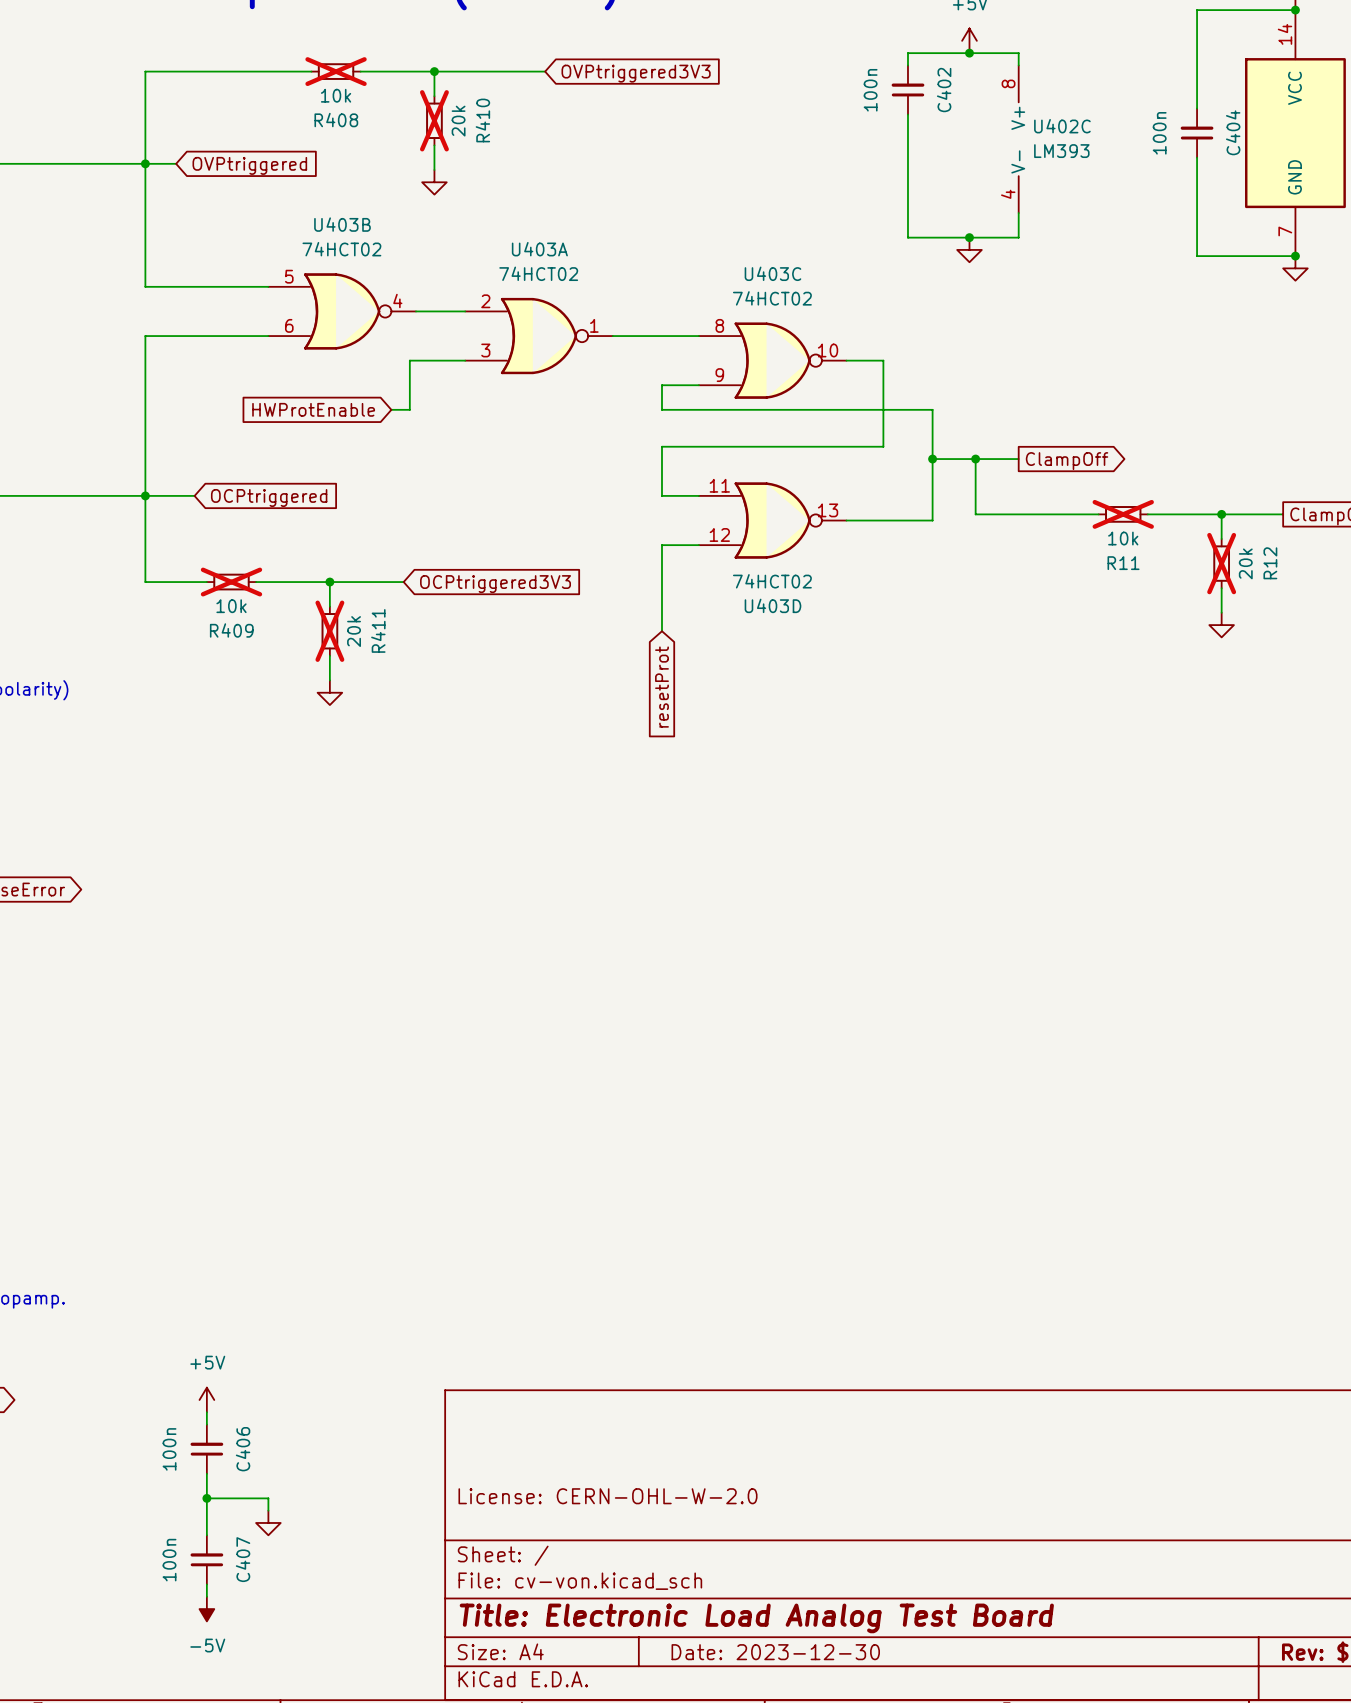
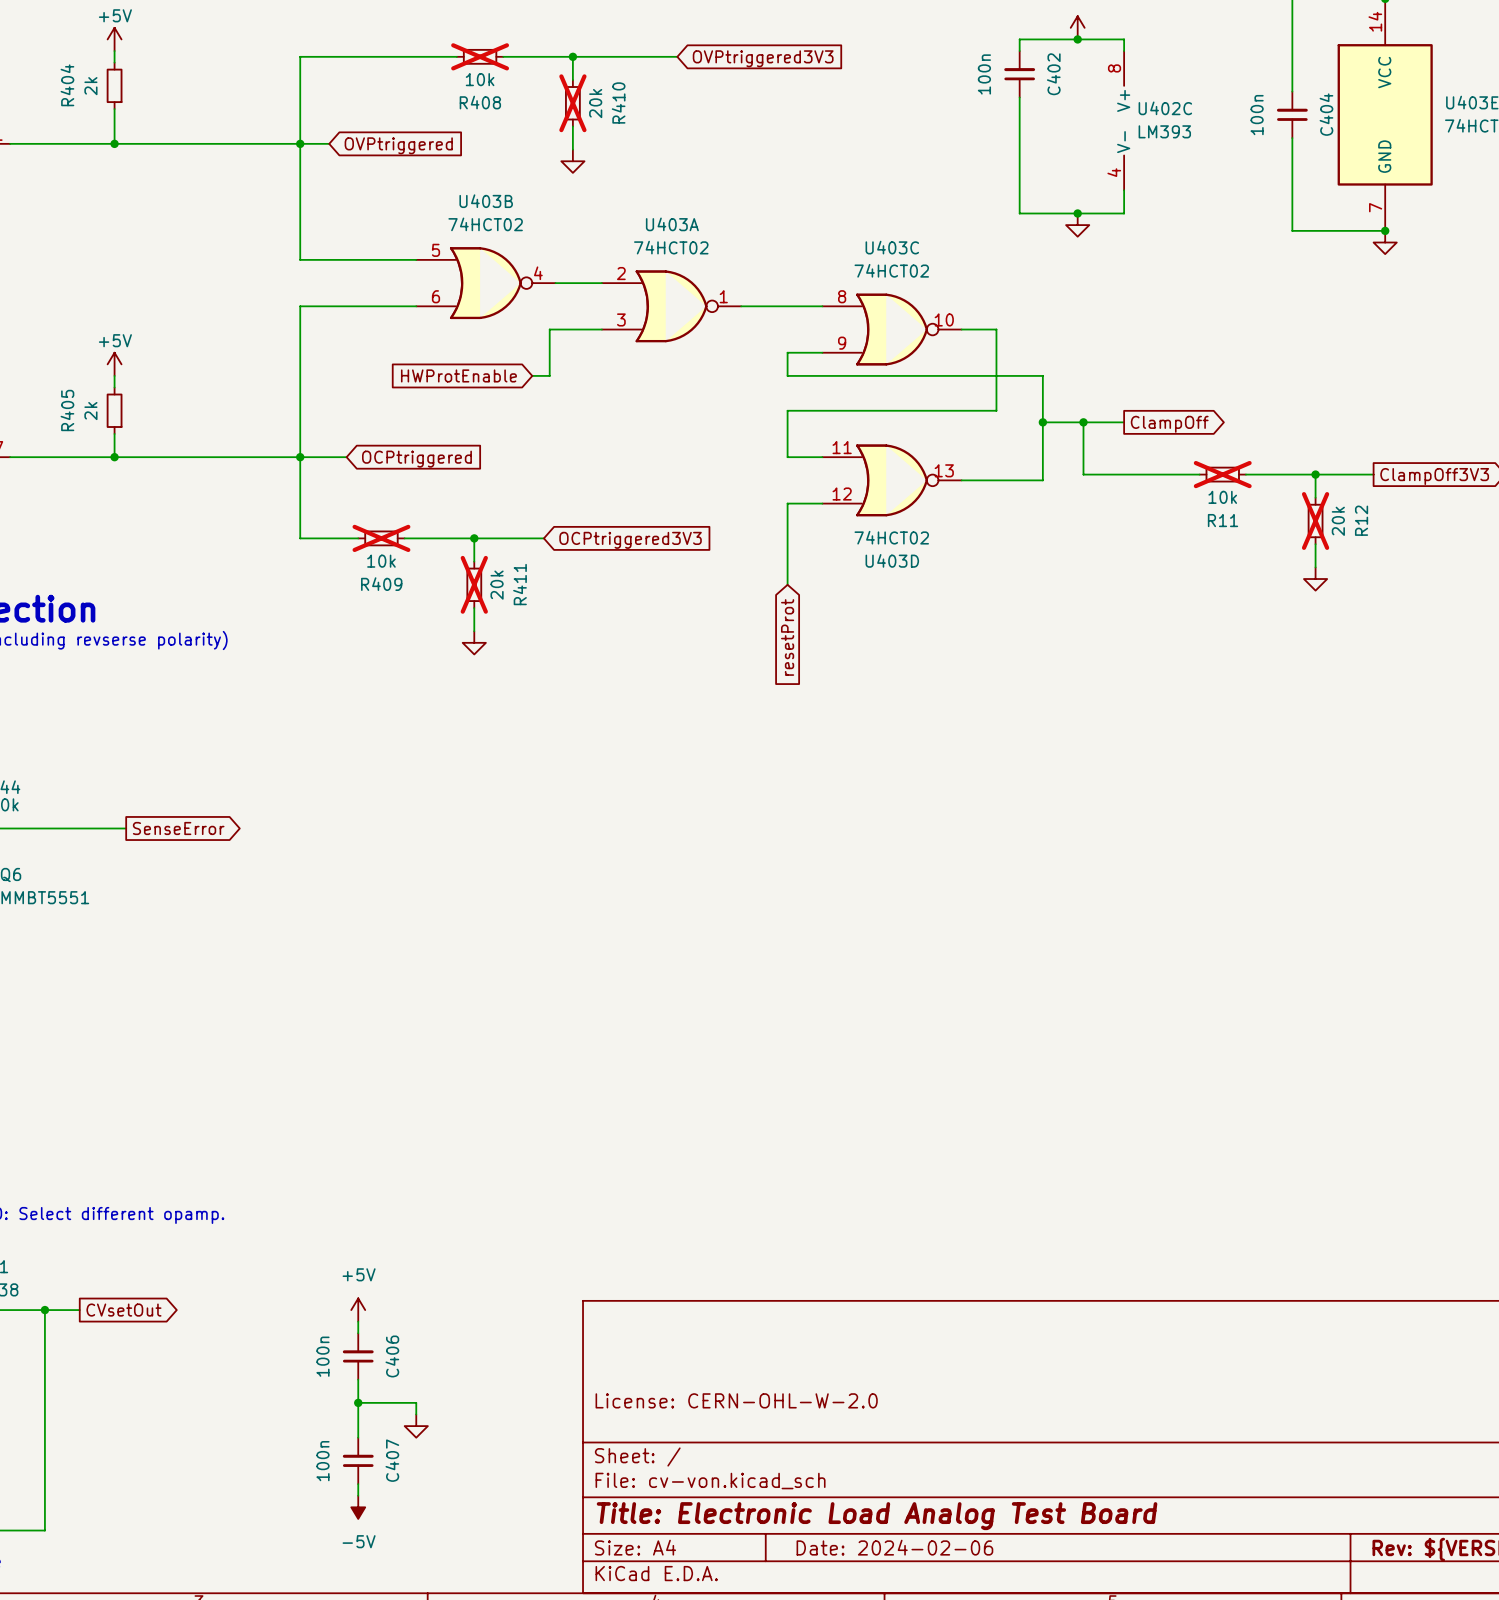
title block: Date: 2023-12-30 (775, 1652) -> Date: 2024-02-06 (894, 1547)

